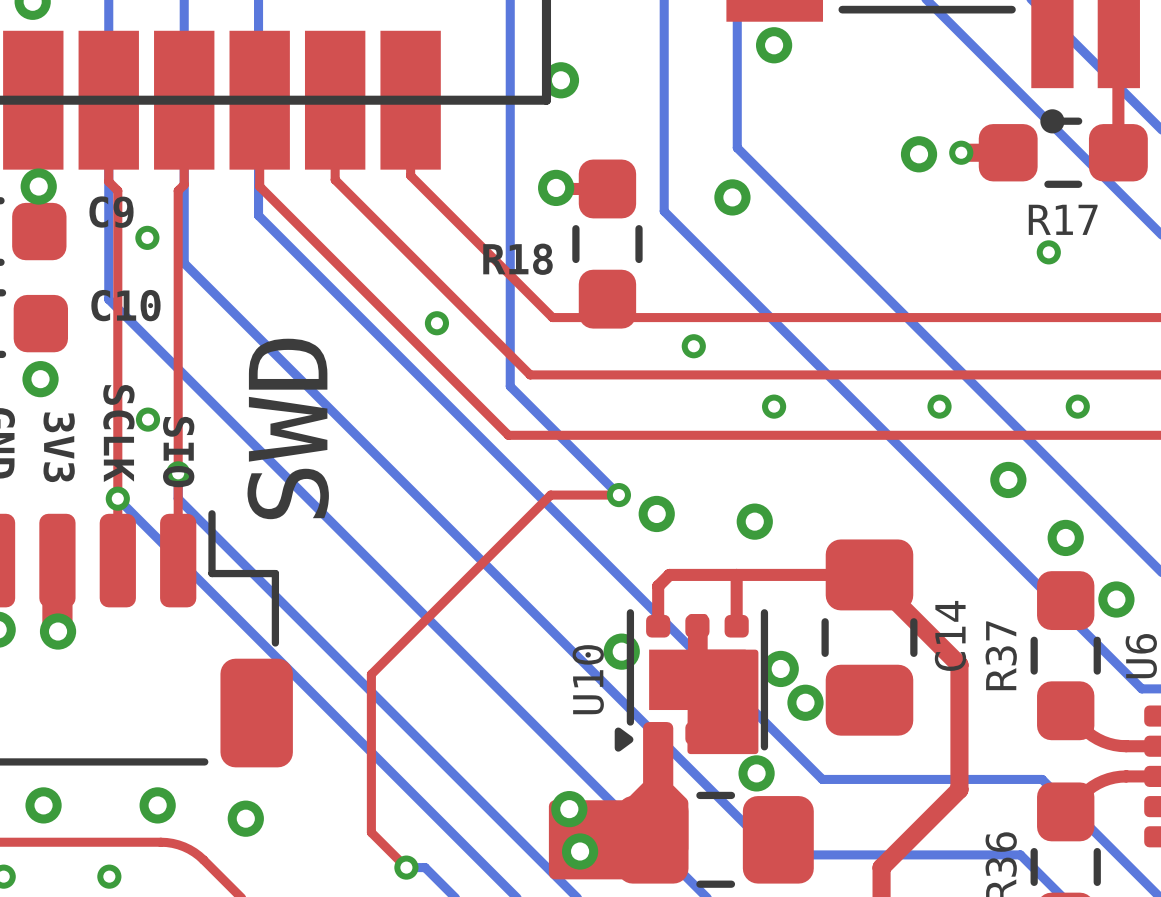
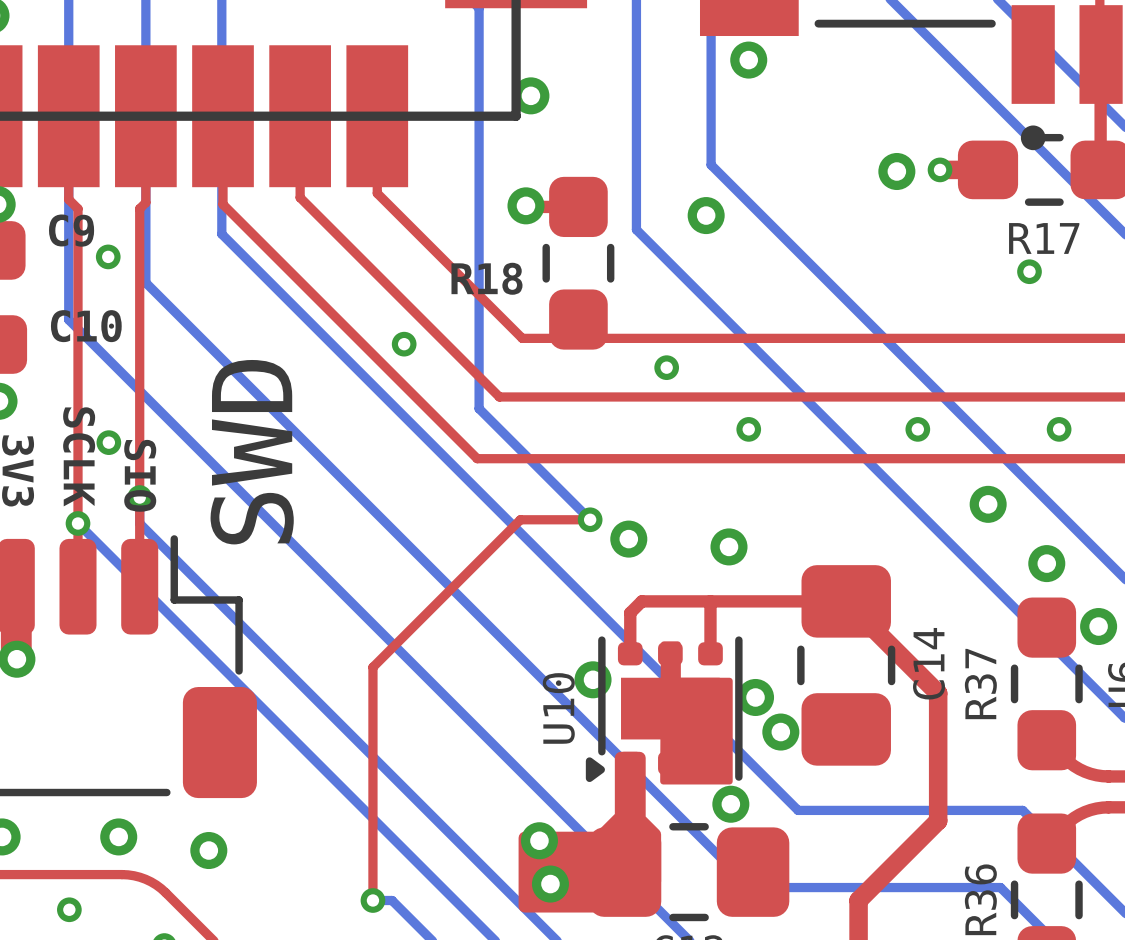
top track: (406, 639) (371, 674) (371, 832) (406, 867) -> (372, 667) (372, 900)

